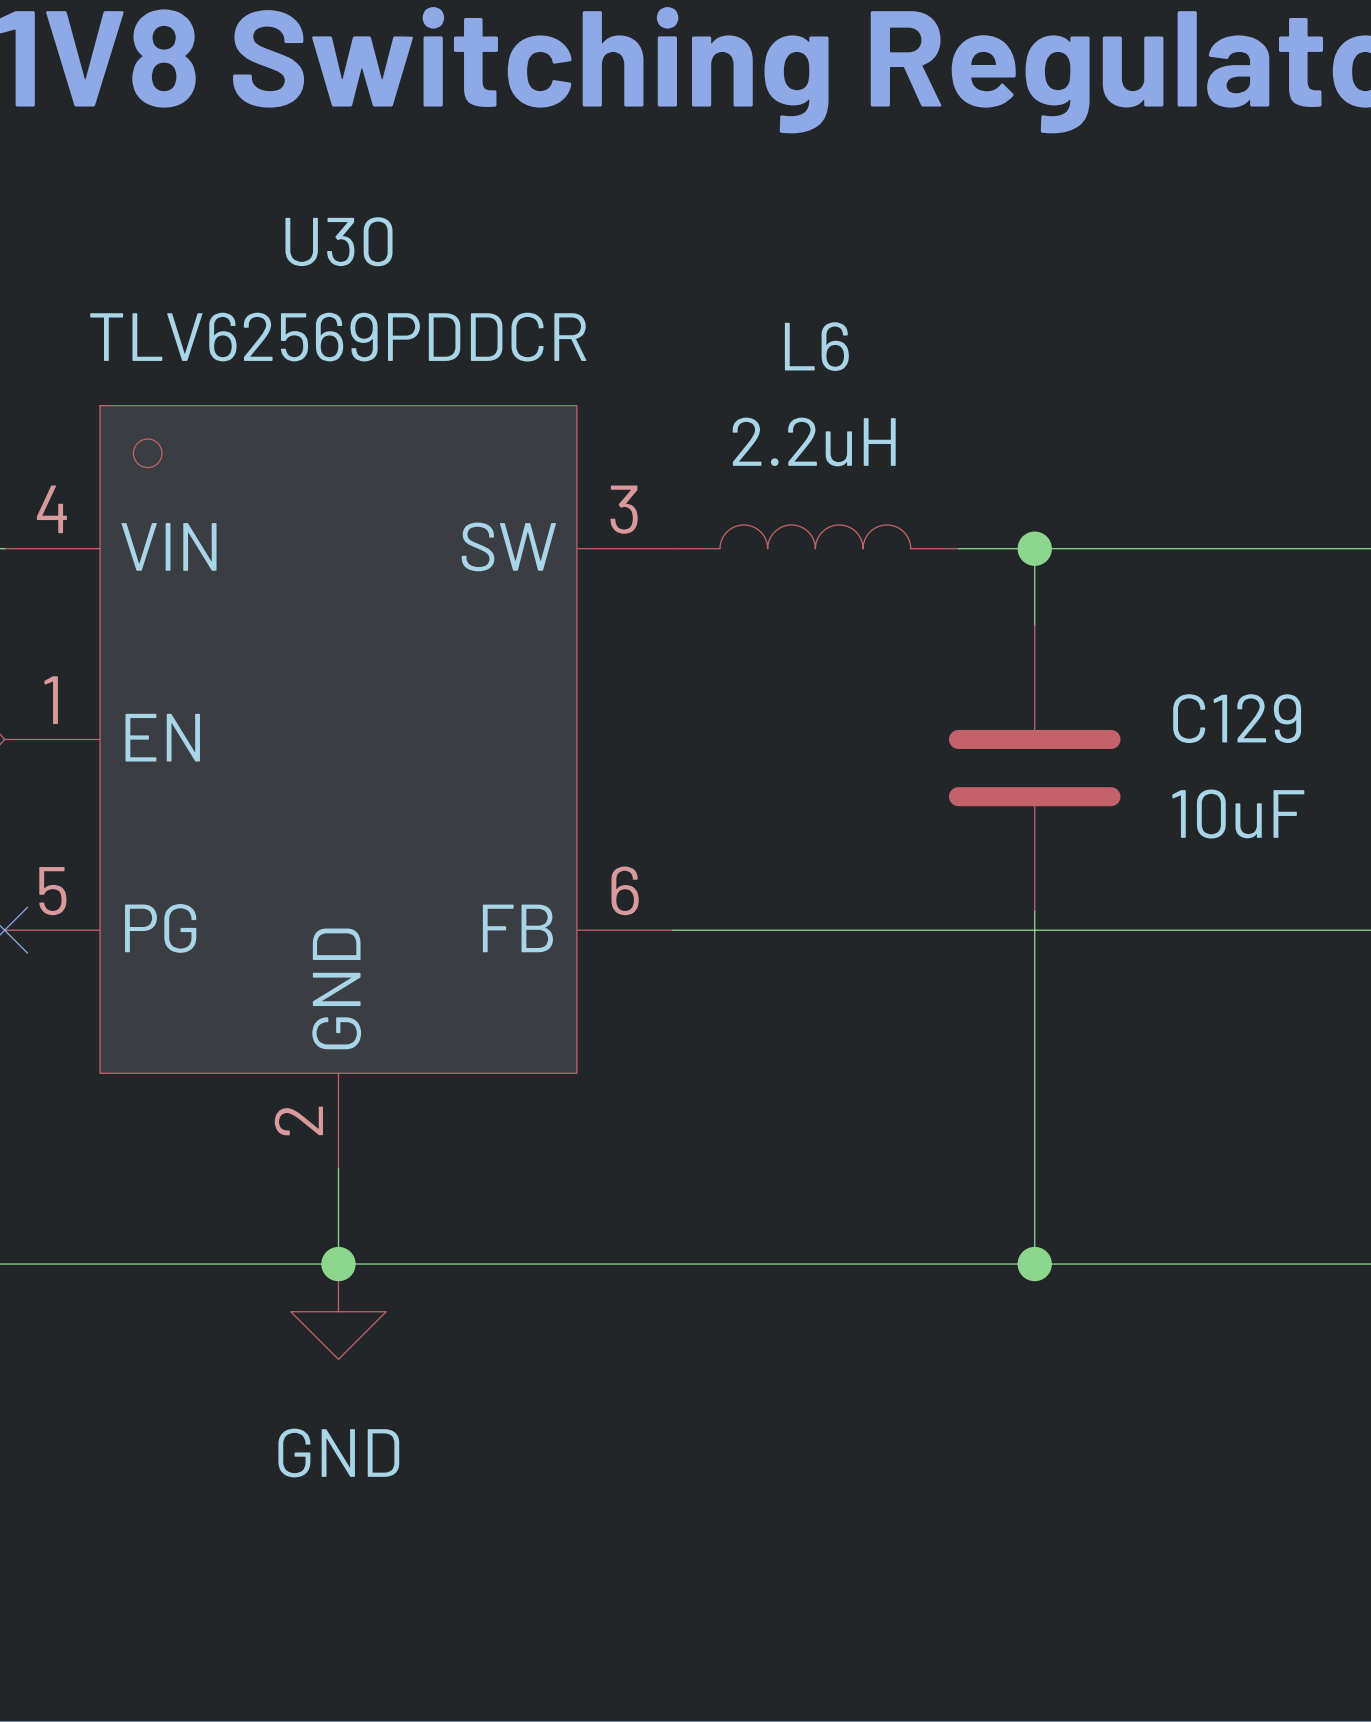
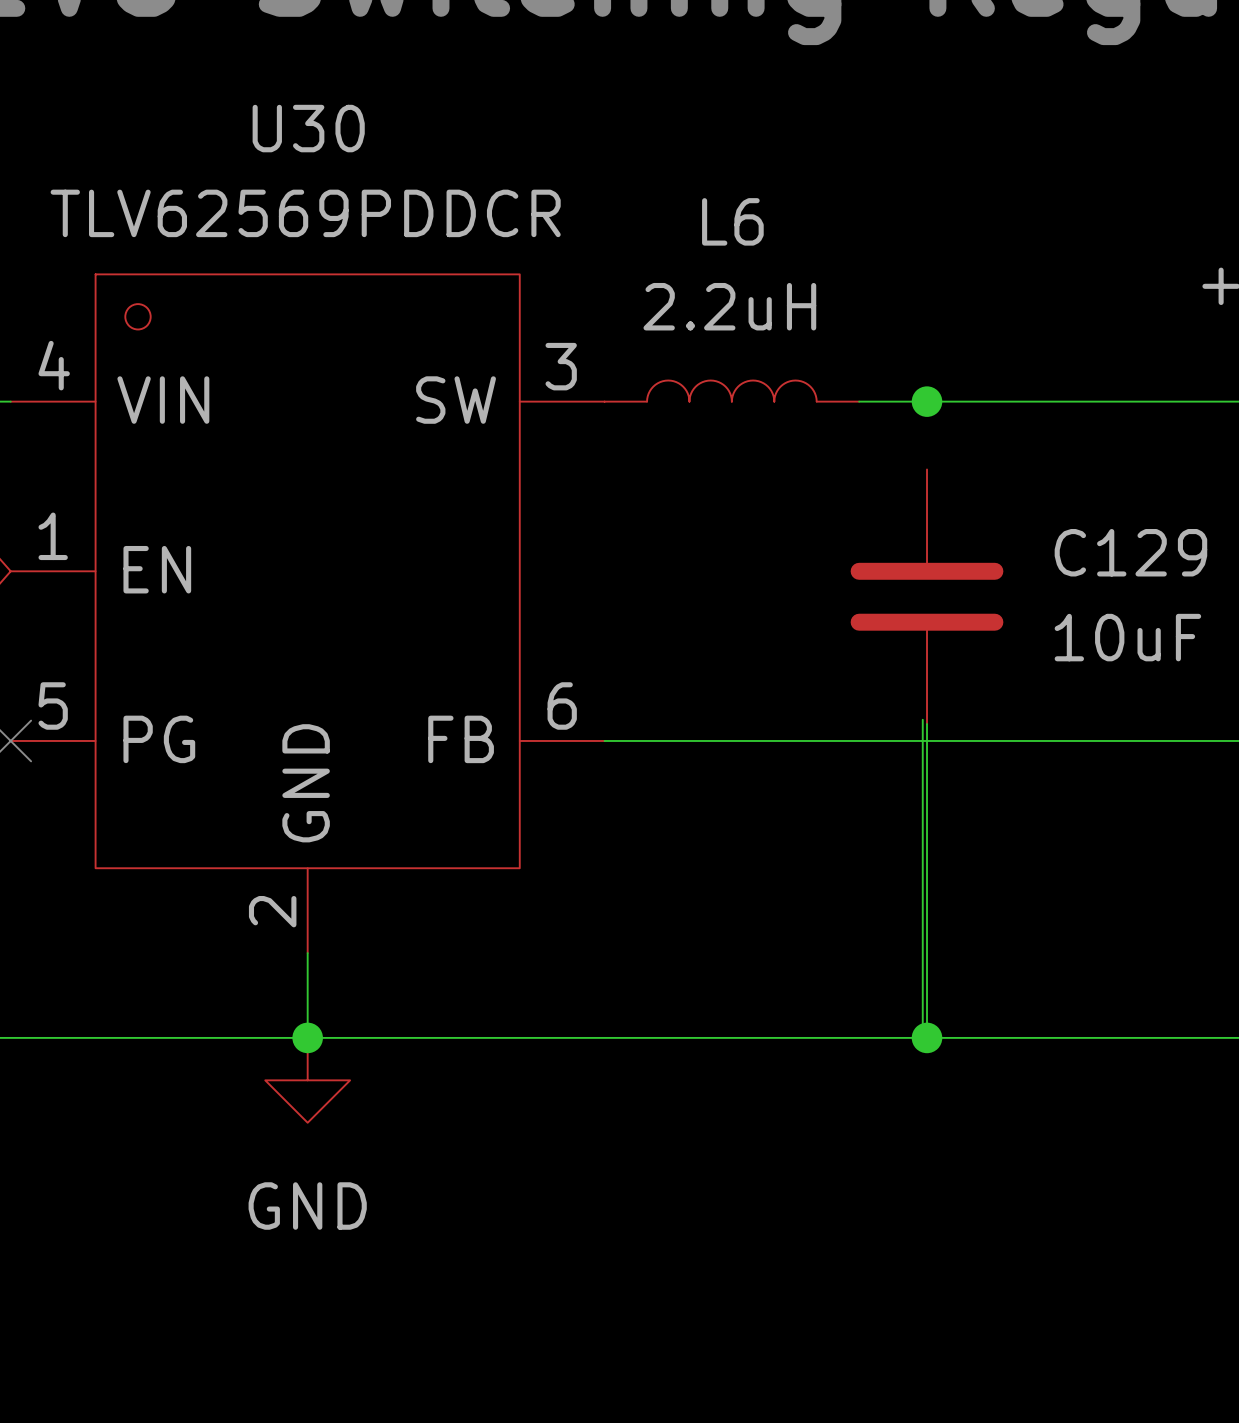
wire: (1034, 548) (1034, 625) -> none
wire: none -> (922, 719) (922, 1037)

